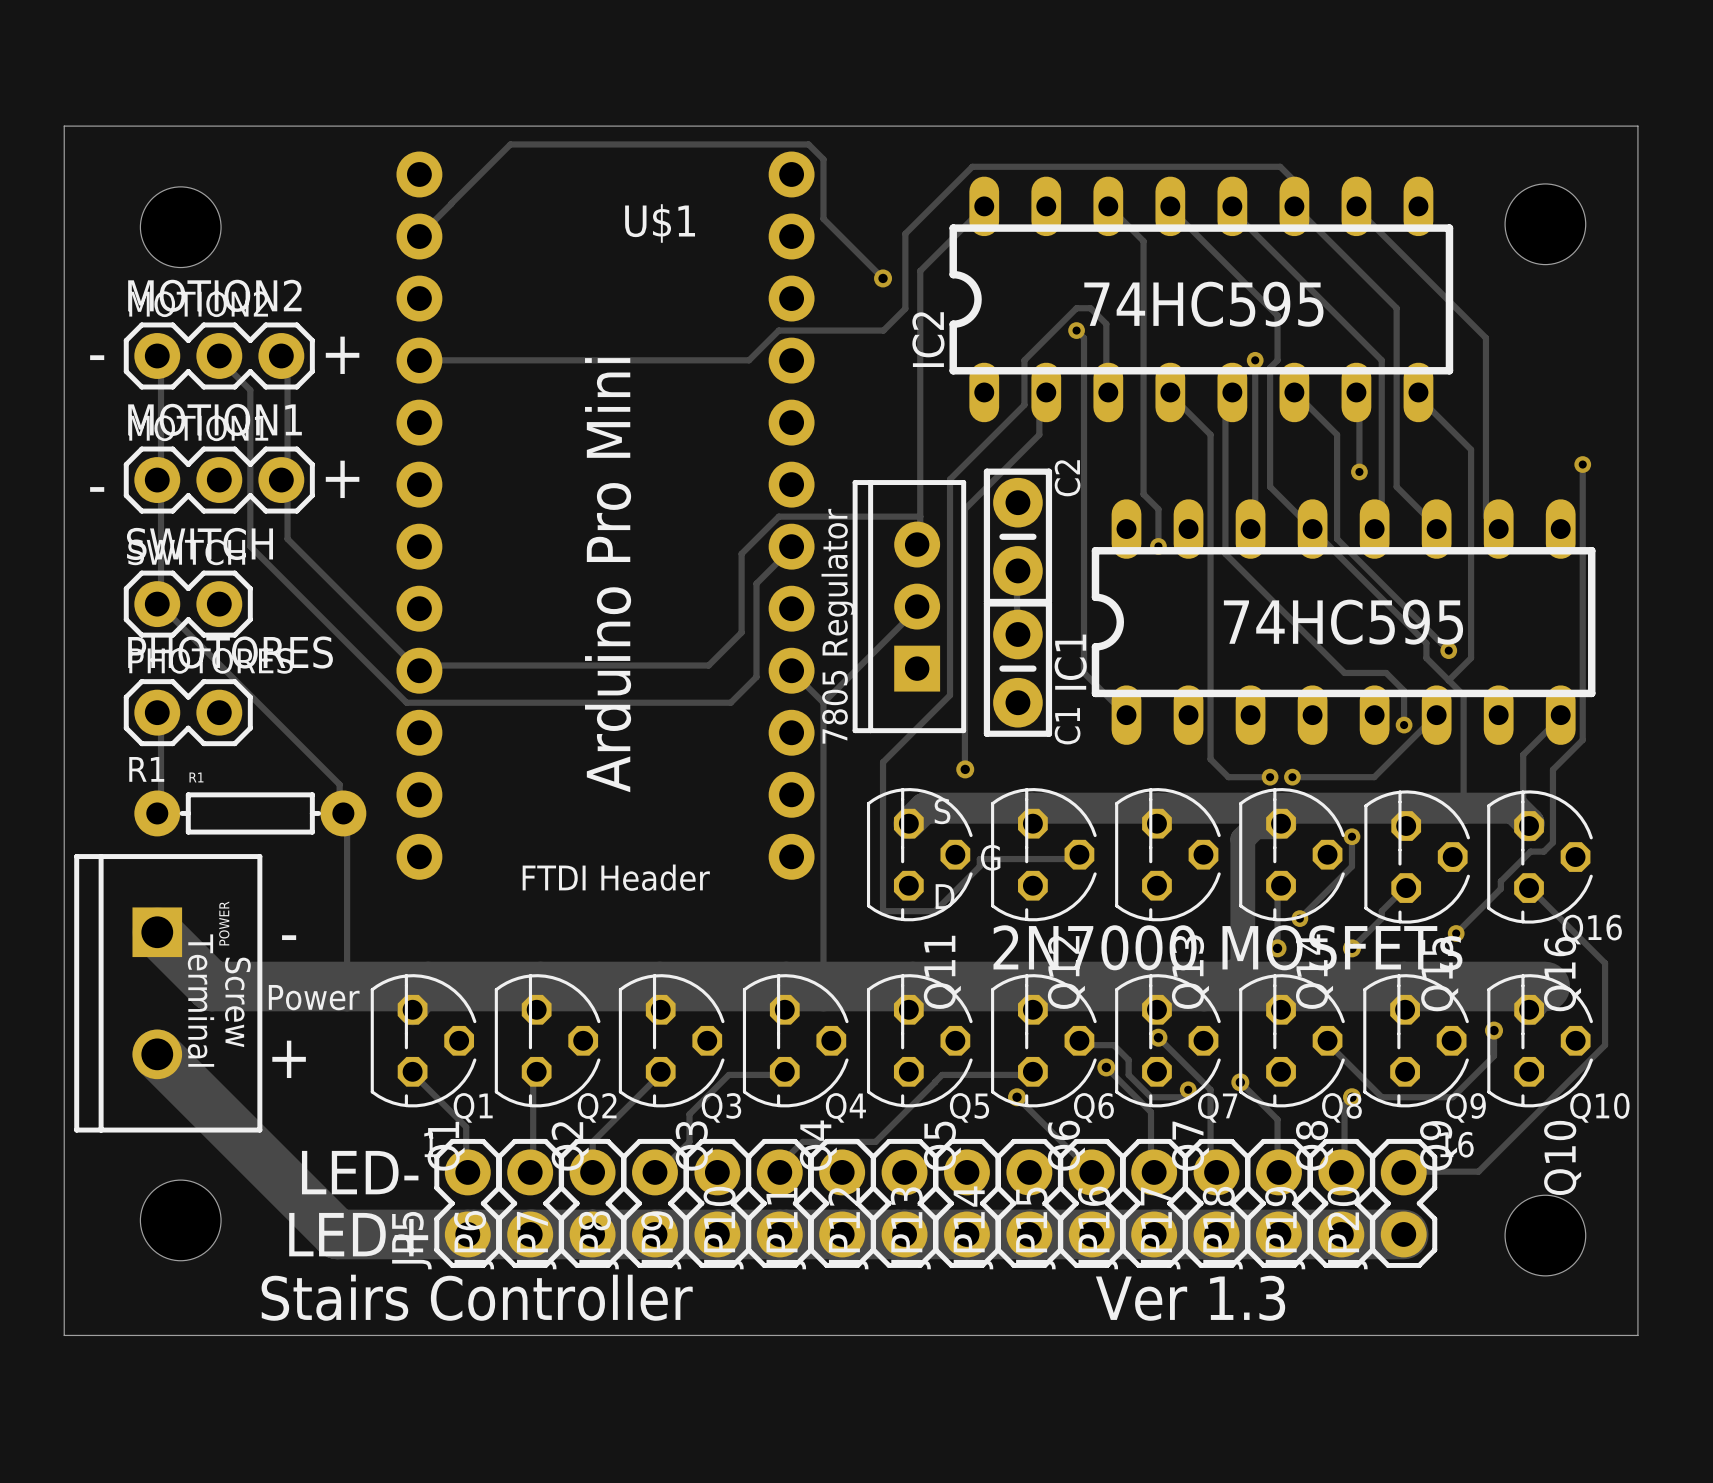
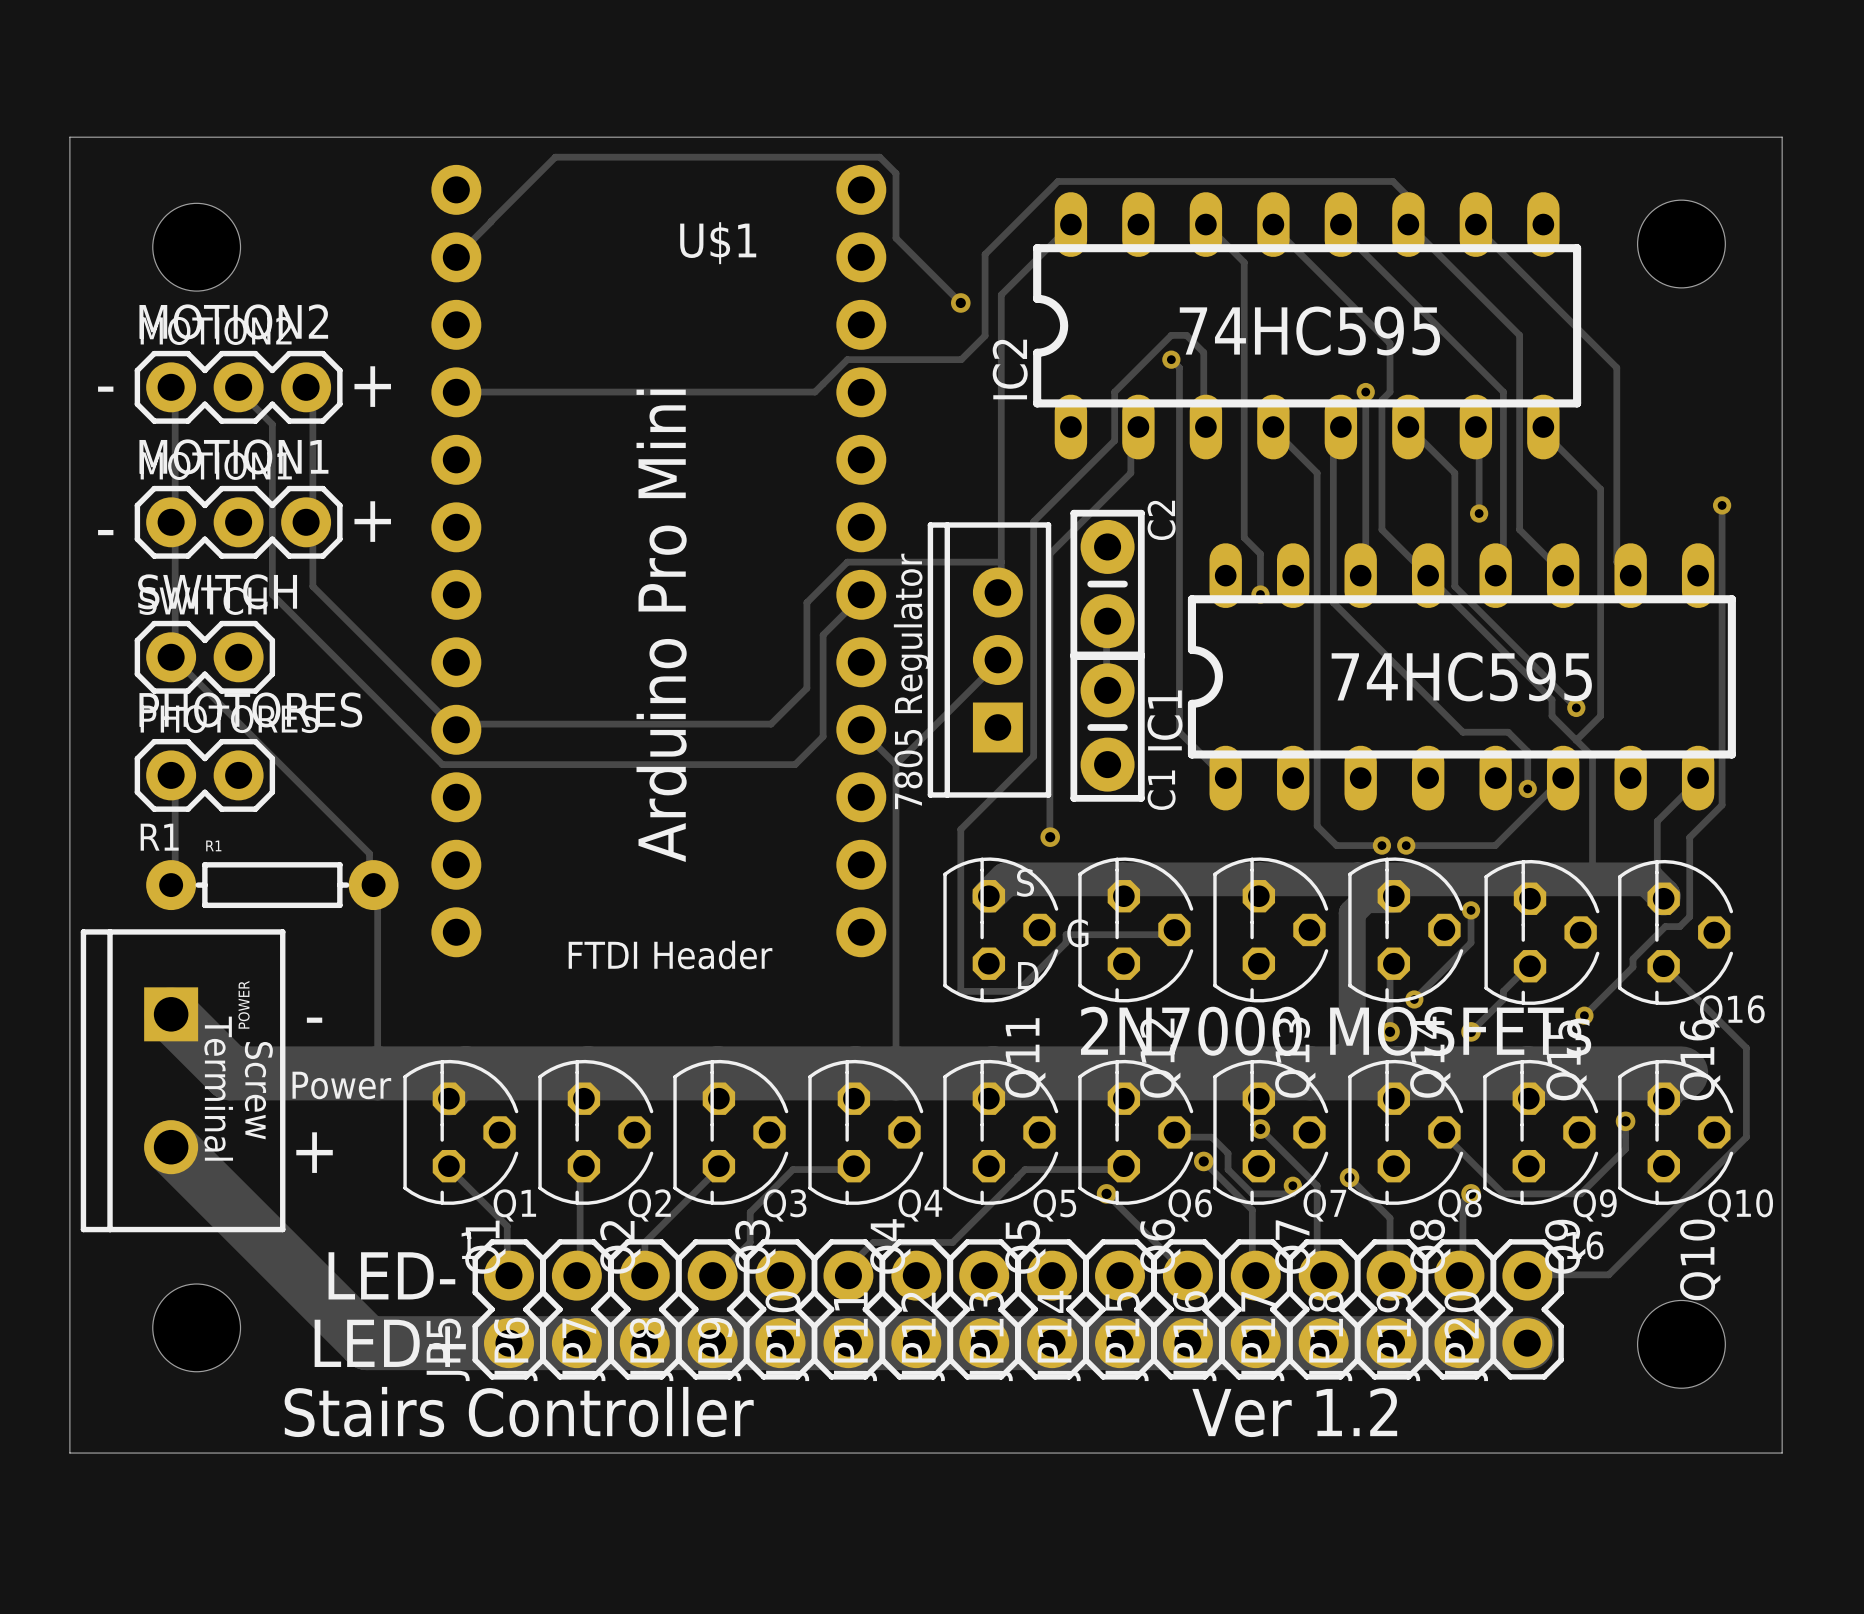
text: Ver 1.3 (1190, 1298) -> Ver 1.2 (1294, 1412)

